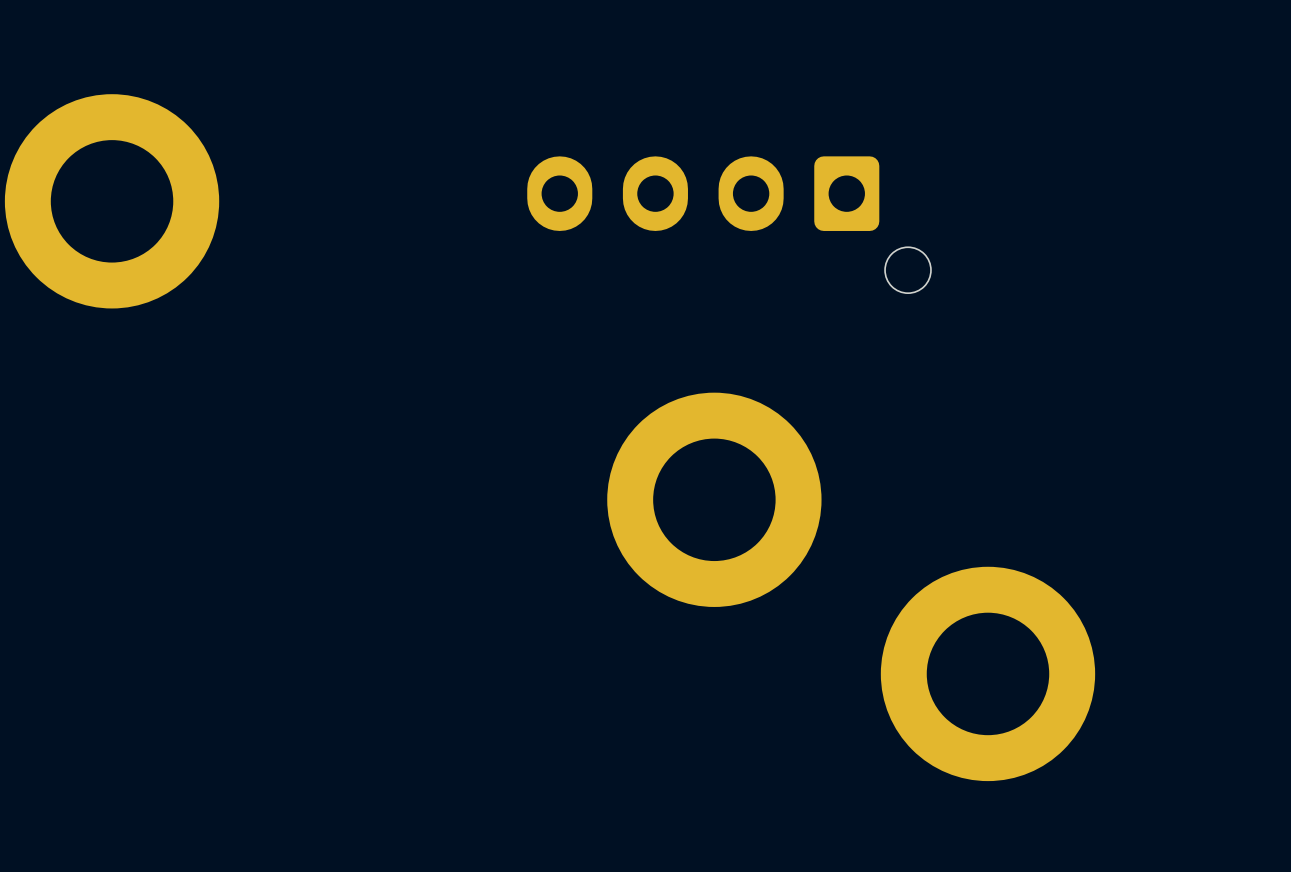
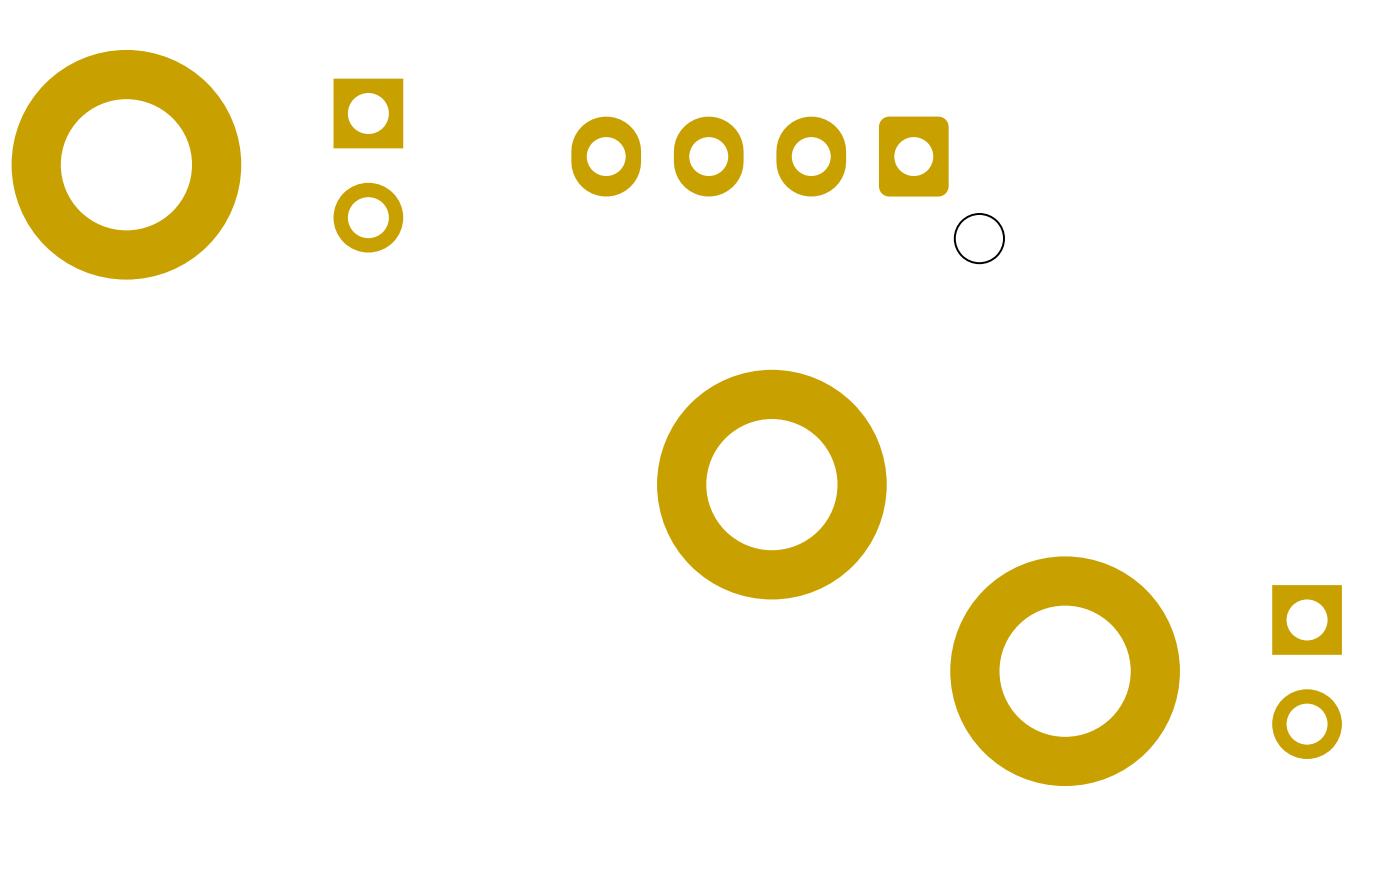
part: none -> (368, 165)
part: none -> (1307, 672)

